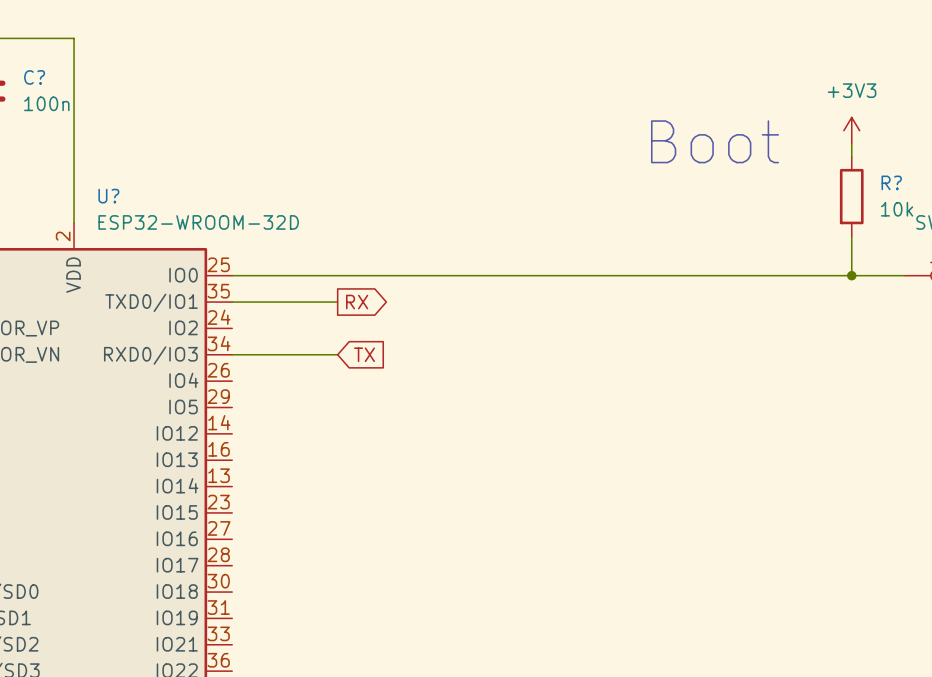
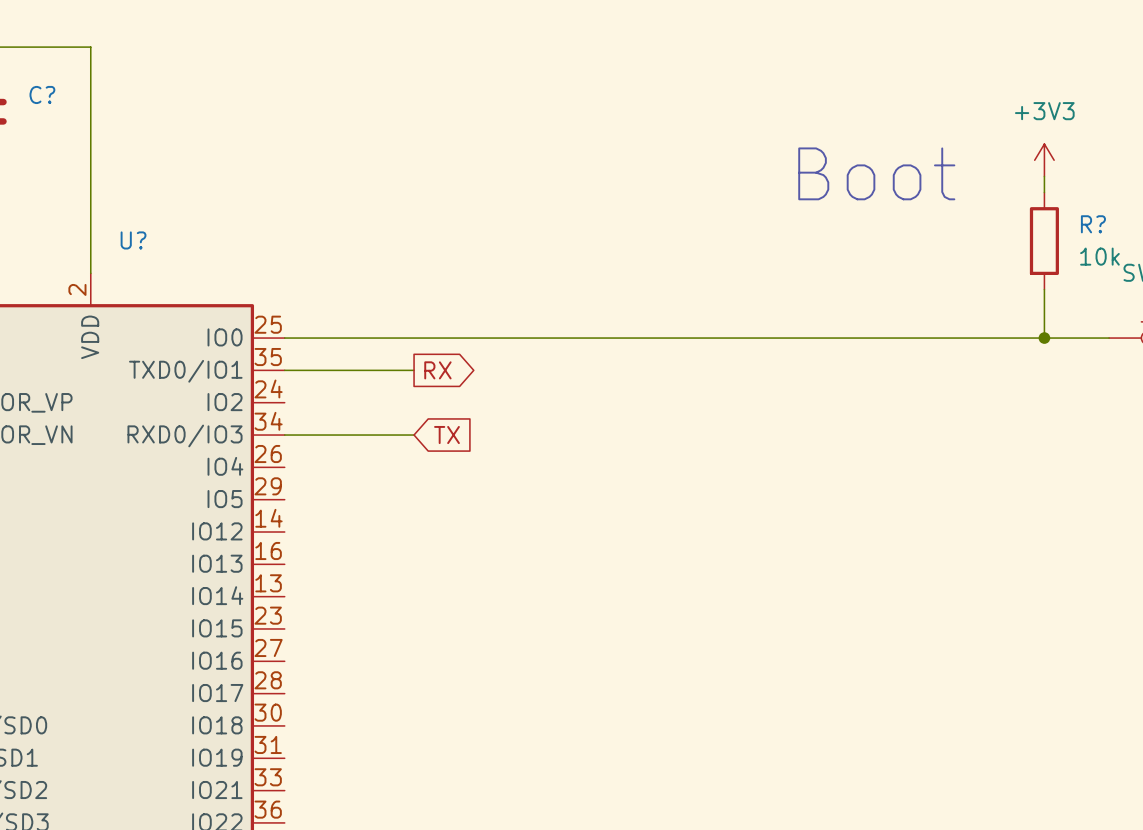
C? value: 100n (46, 103) -> none
U? value: ESP32-WROOM-32D (198, 222) -> none

